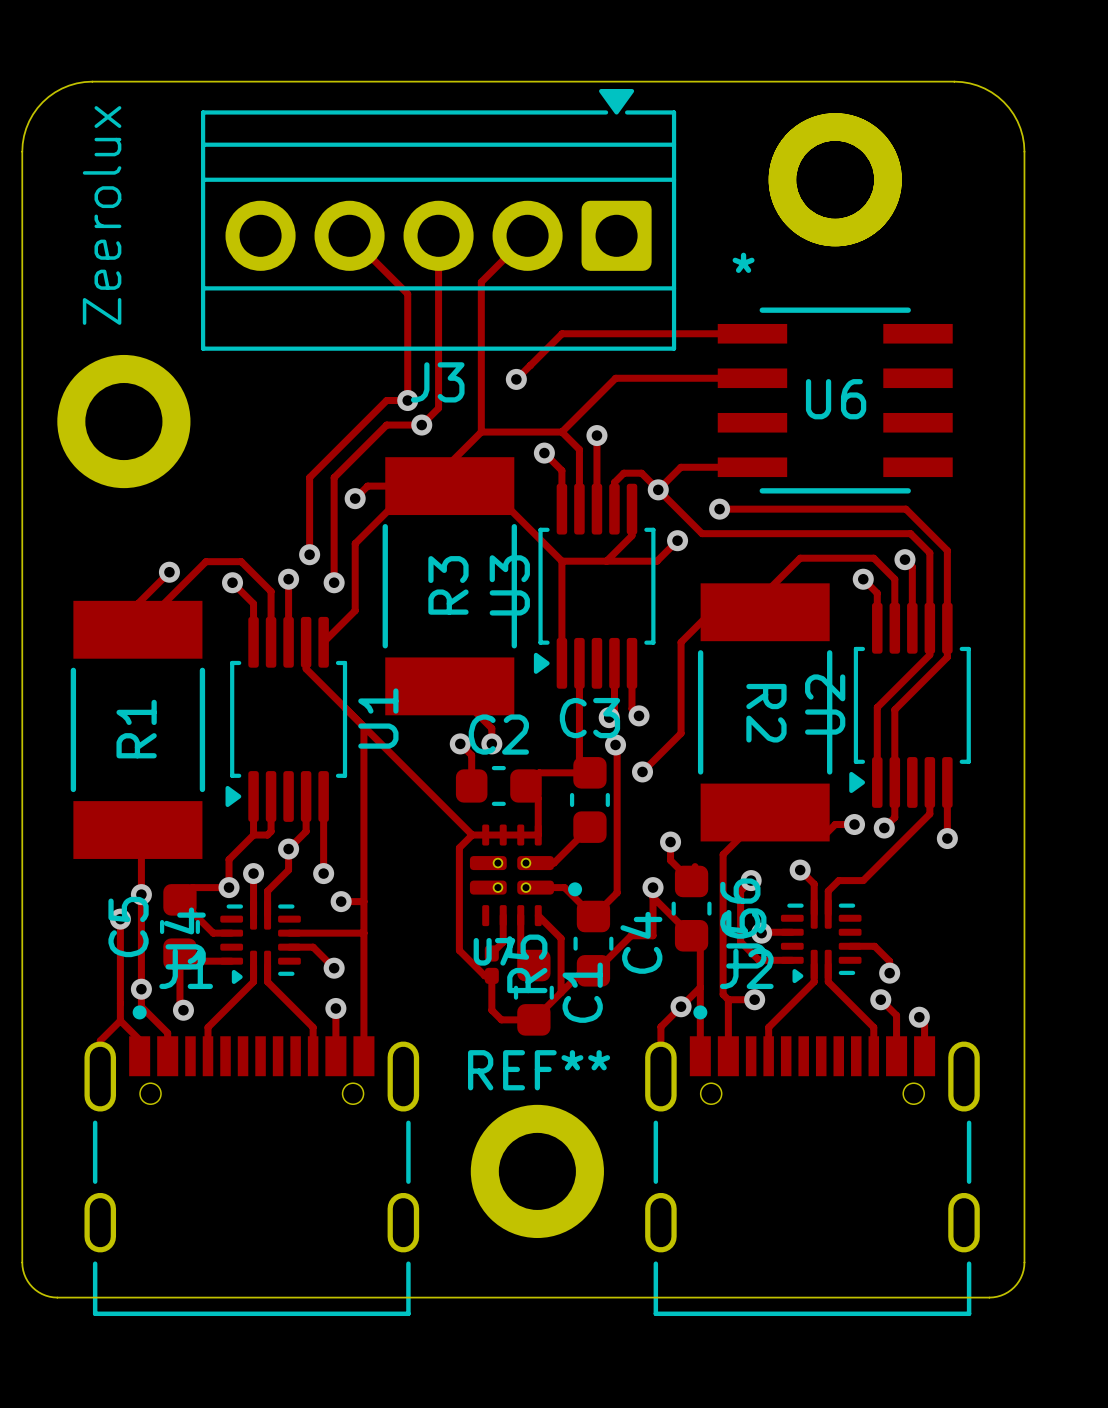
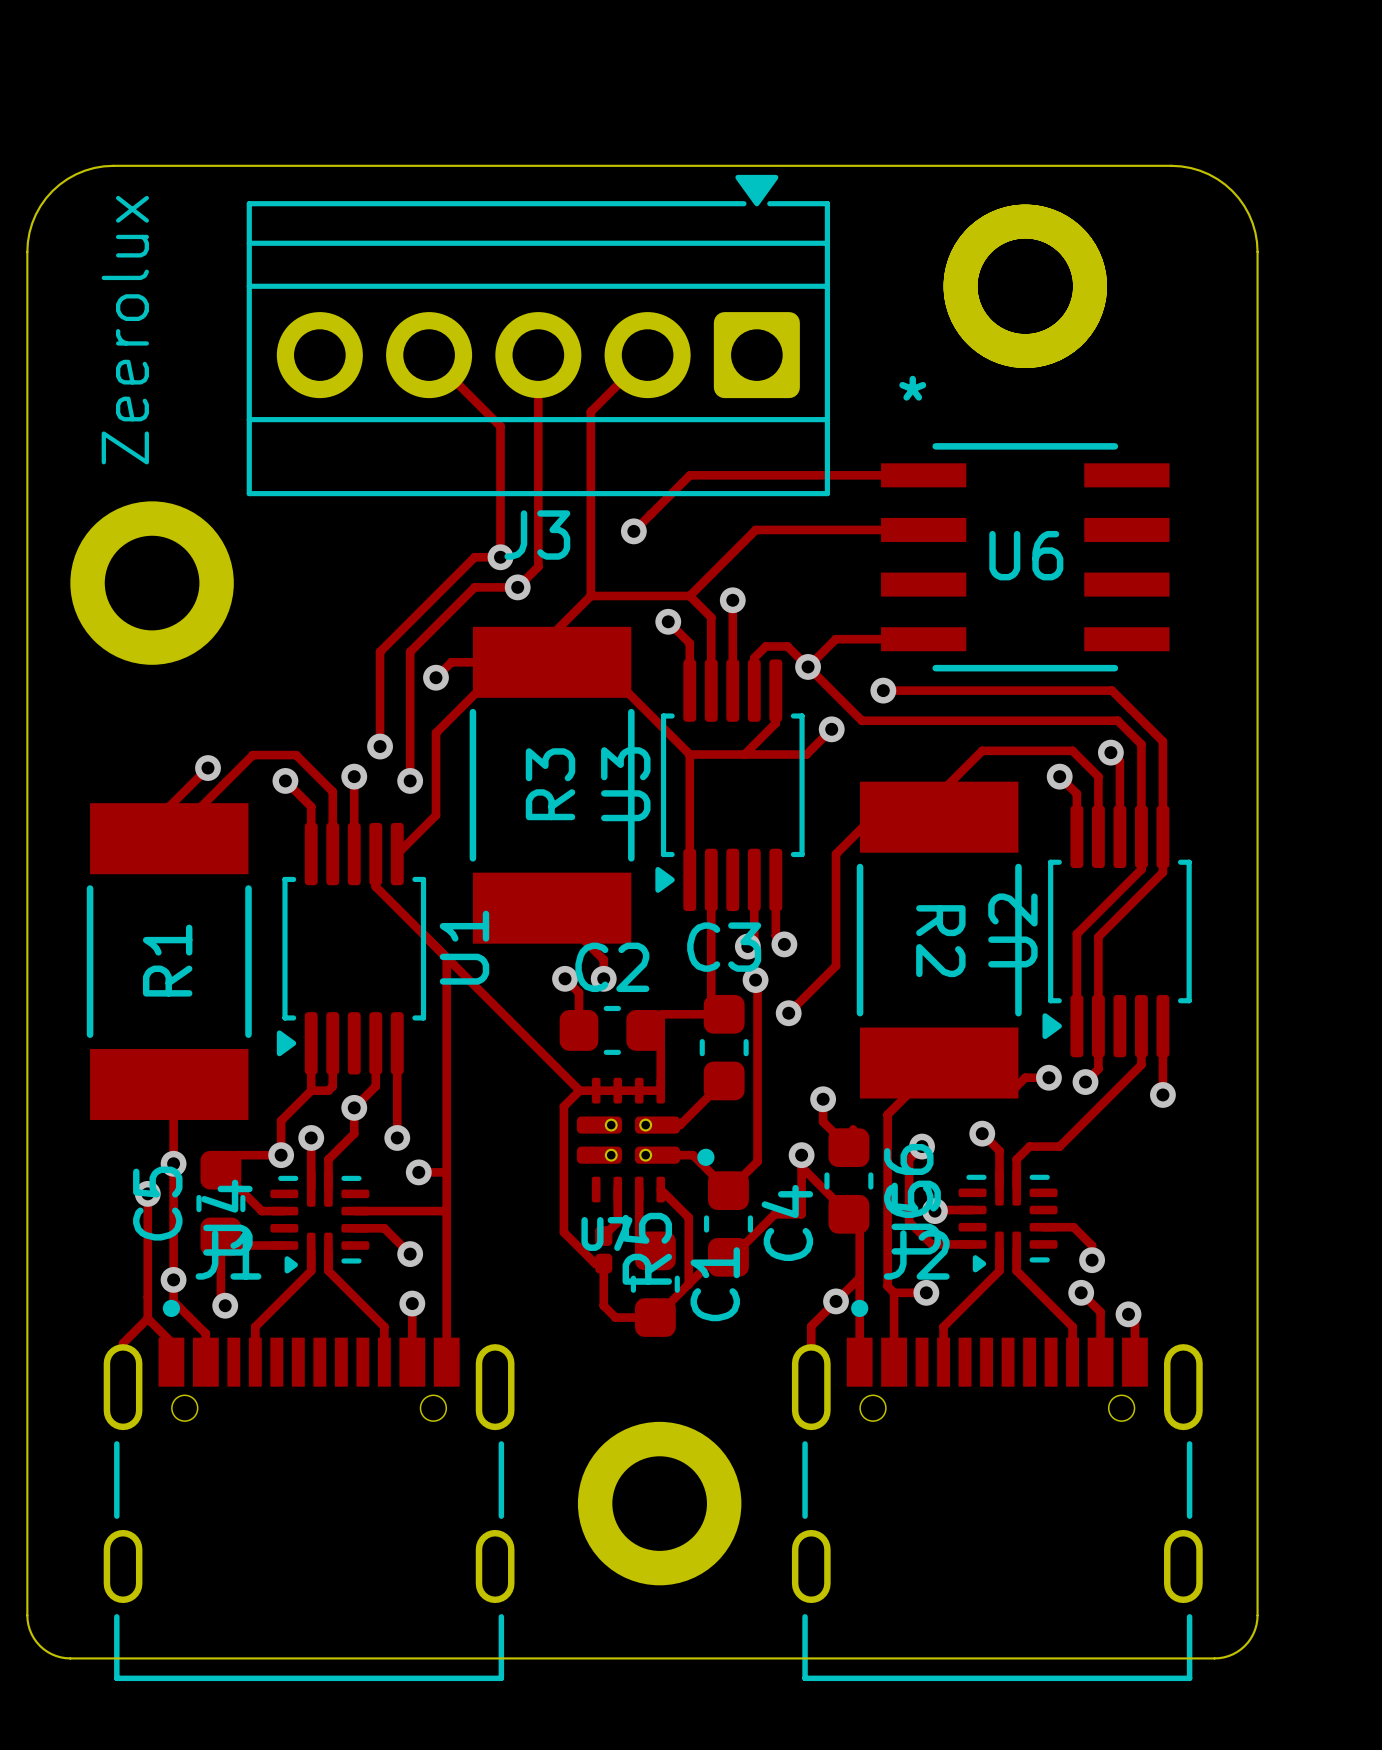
REF** name: REF** (539, 1070) -> none

